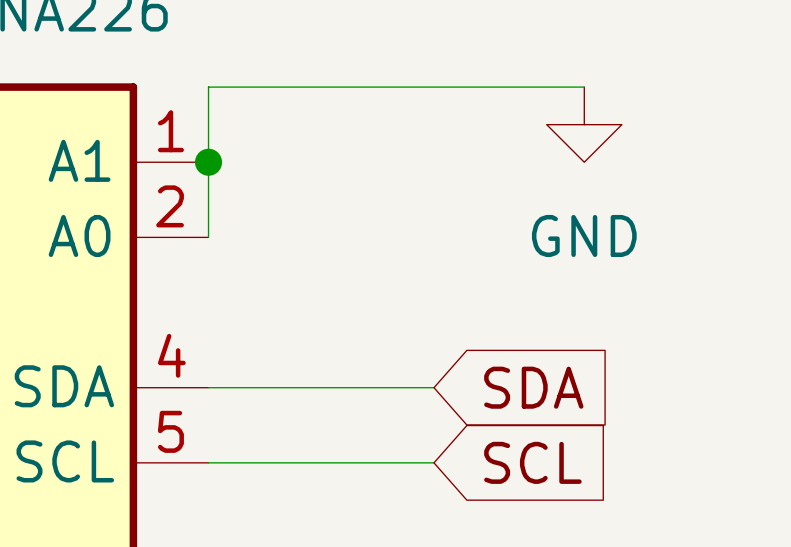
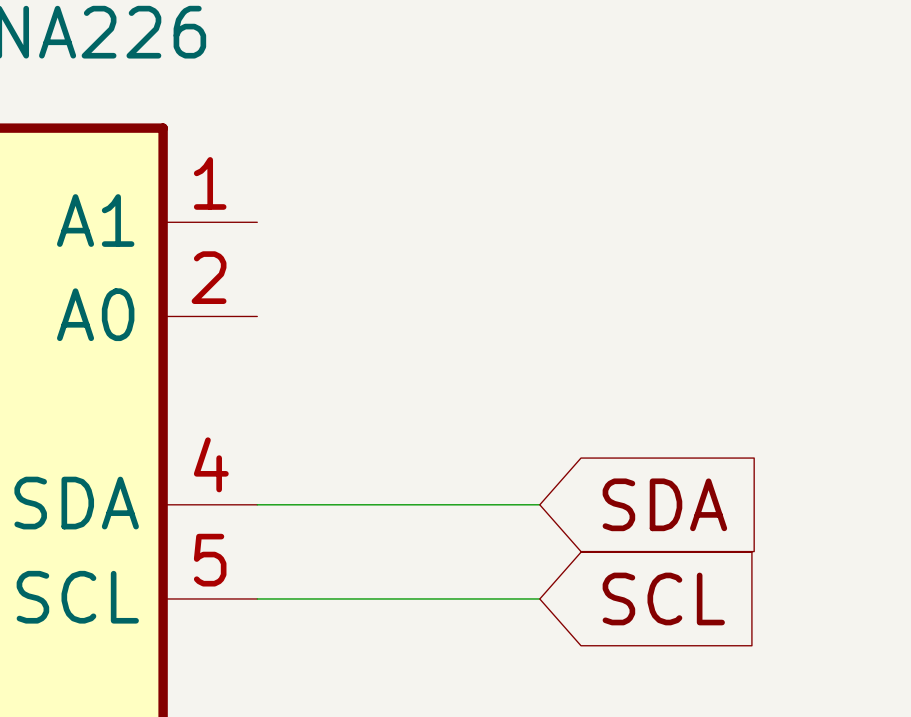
wire: (584, 87) (208, 87) (208, 237) -> none
power symbol: GND (584, 124) -> none
junction: (208, 162) -> none

